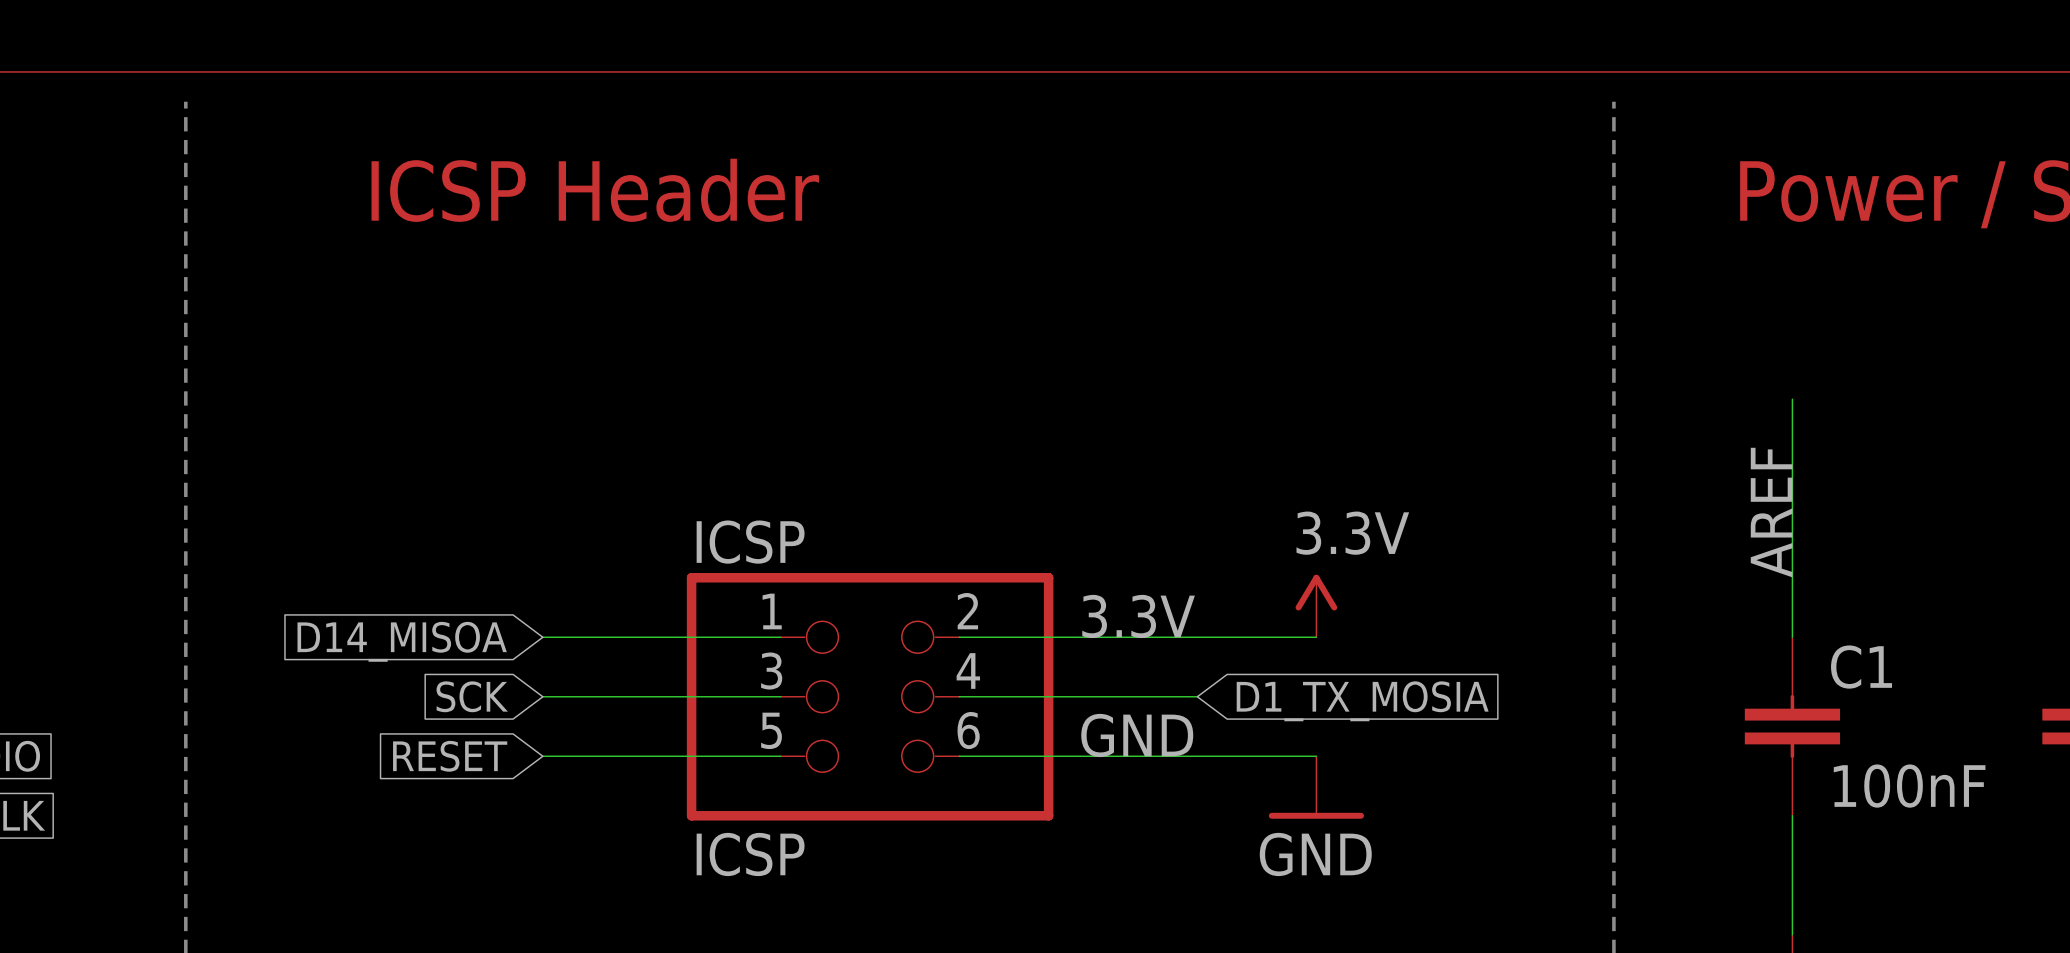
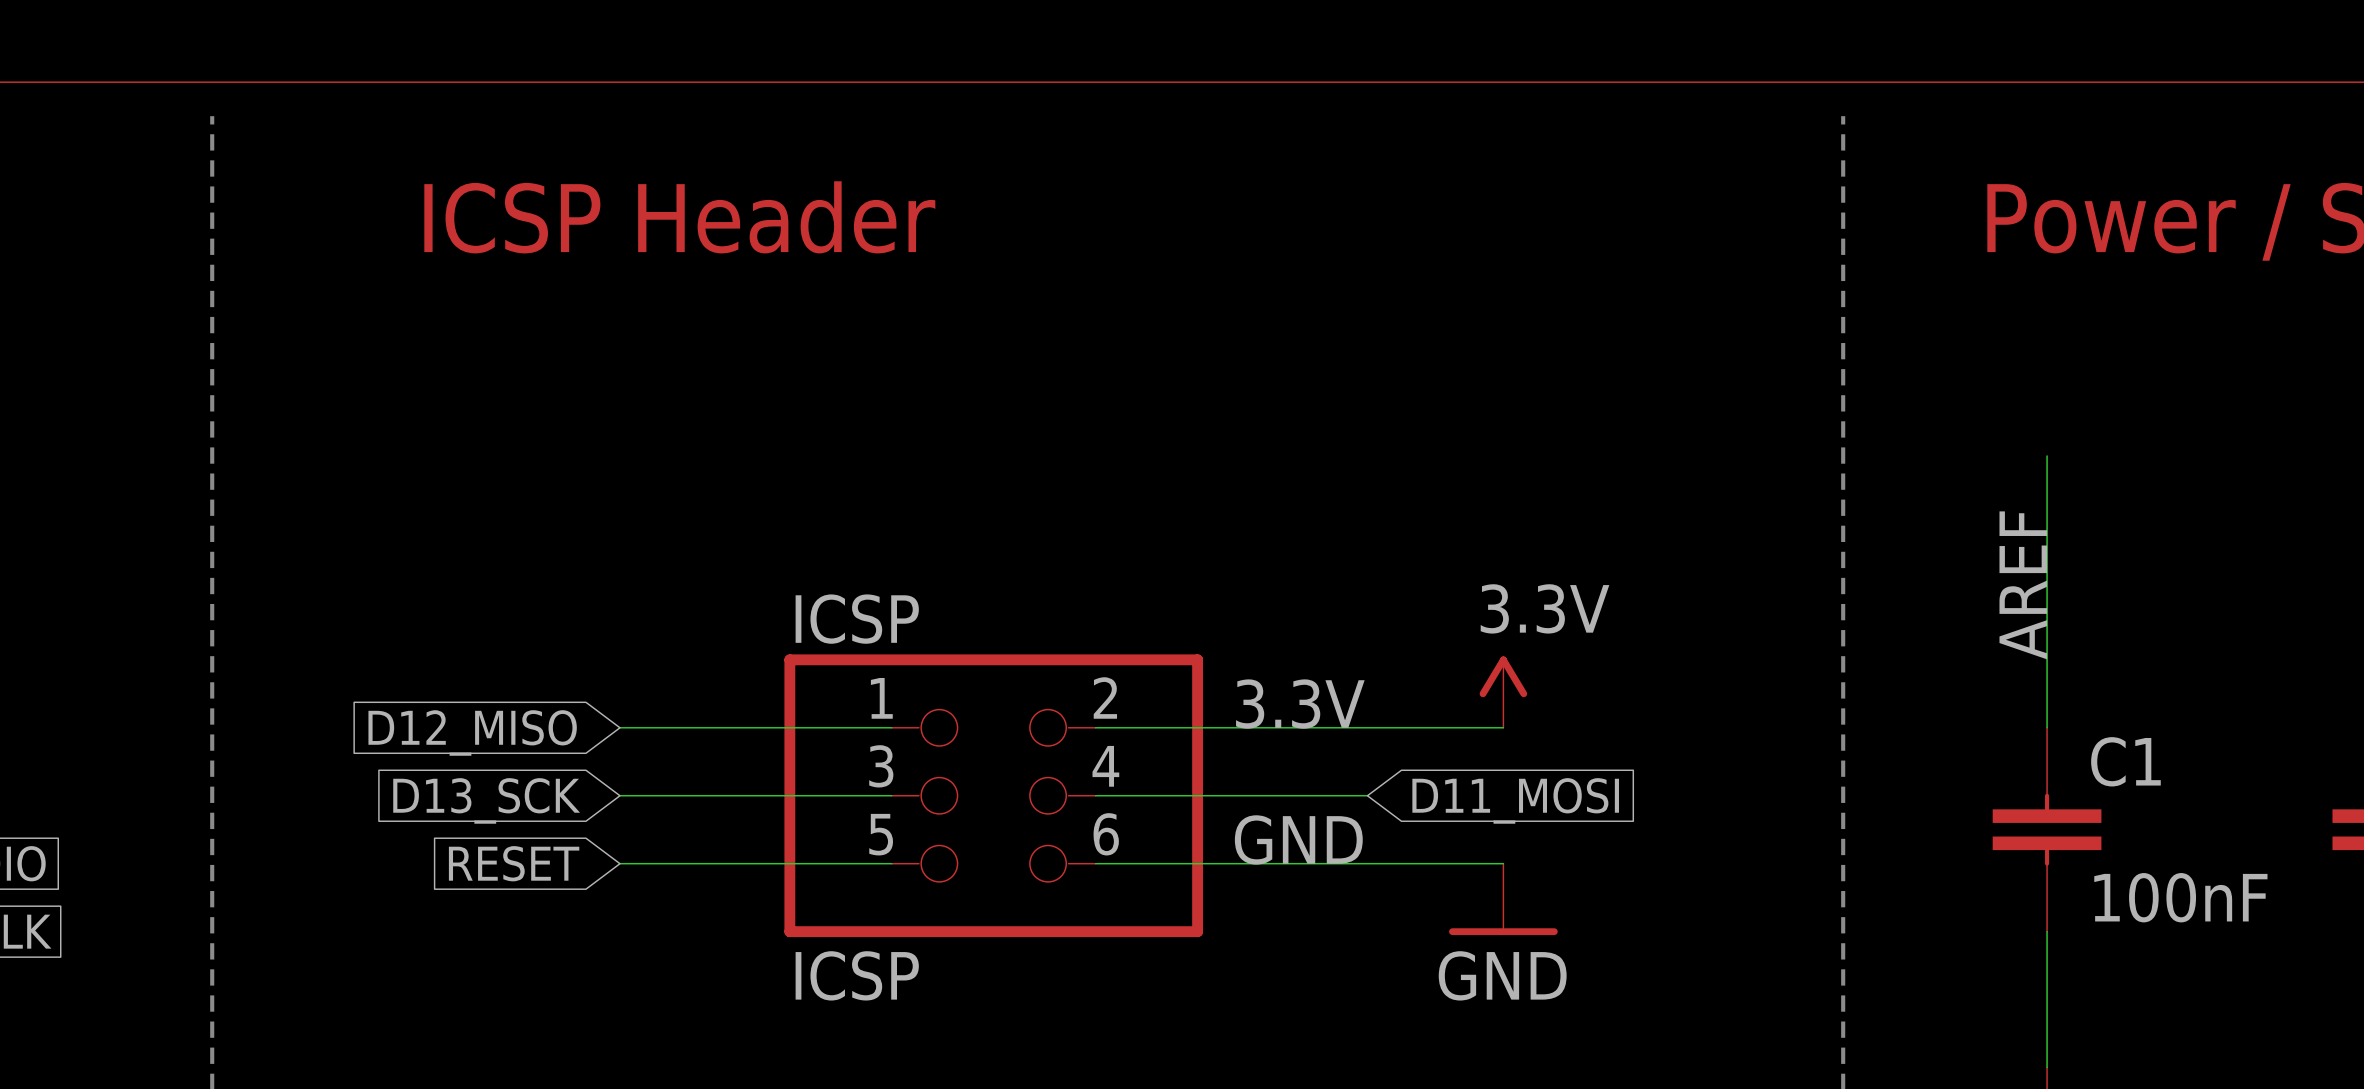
global label: D14_MISOA (402, 641) -> D12_MISO (472, 732)
global label: SCK (472, 696) -> D13_SCK (486, 800)
global label: D1_TX_MOSIA (1362, 701) -> D11_MOSI (1515, 800)

